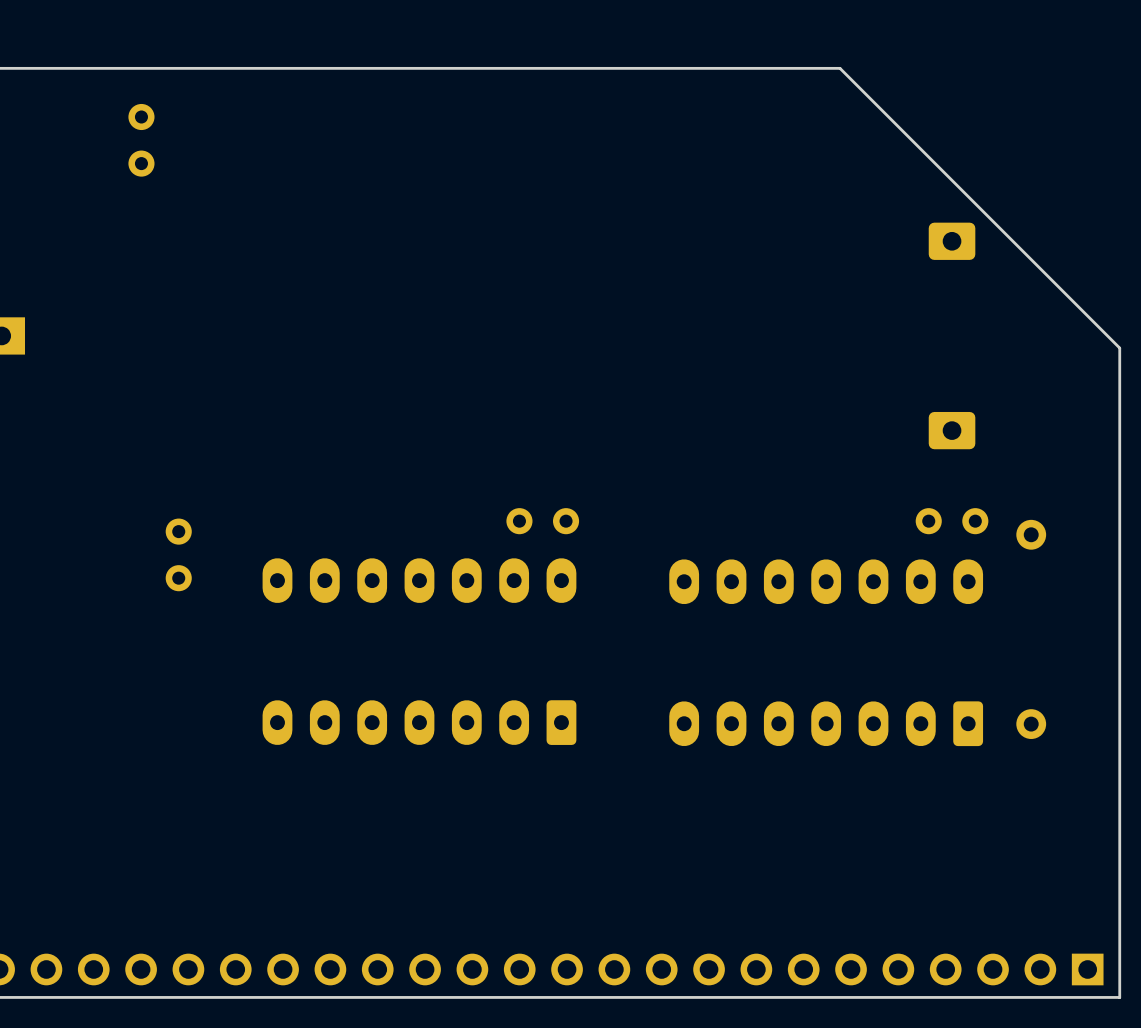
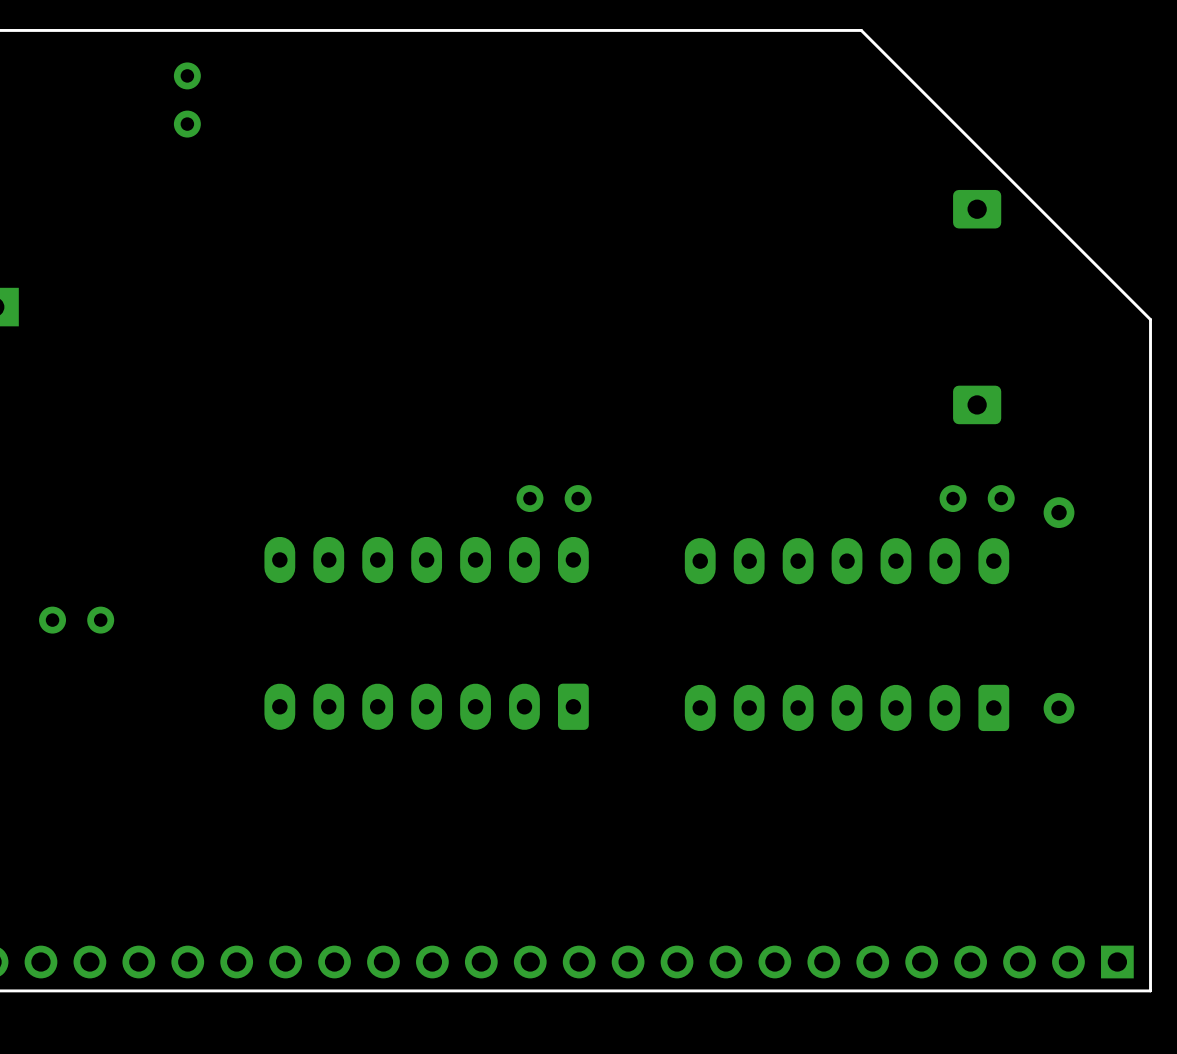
part position: (141, 140) -> (187, 100)
part rotation: 0° (178, 554) -> 90° clockwise (76, 620)
part position: (178, 554) -> (76, 620)

